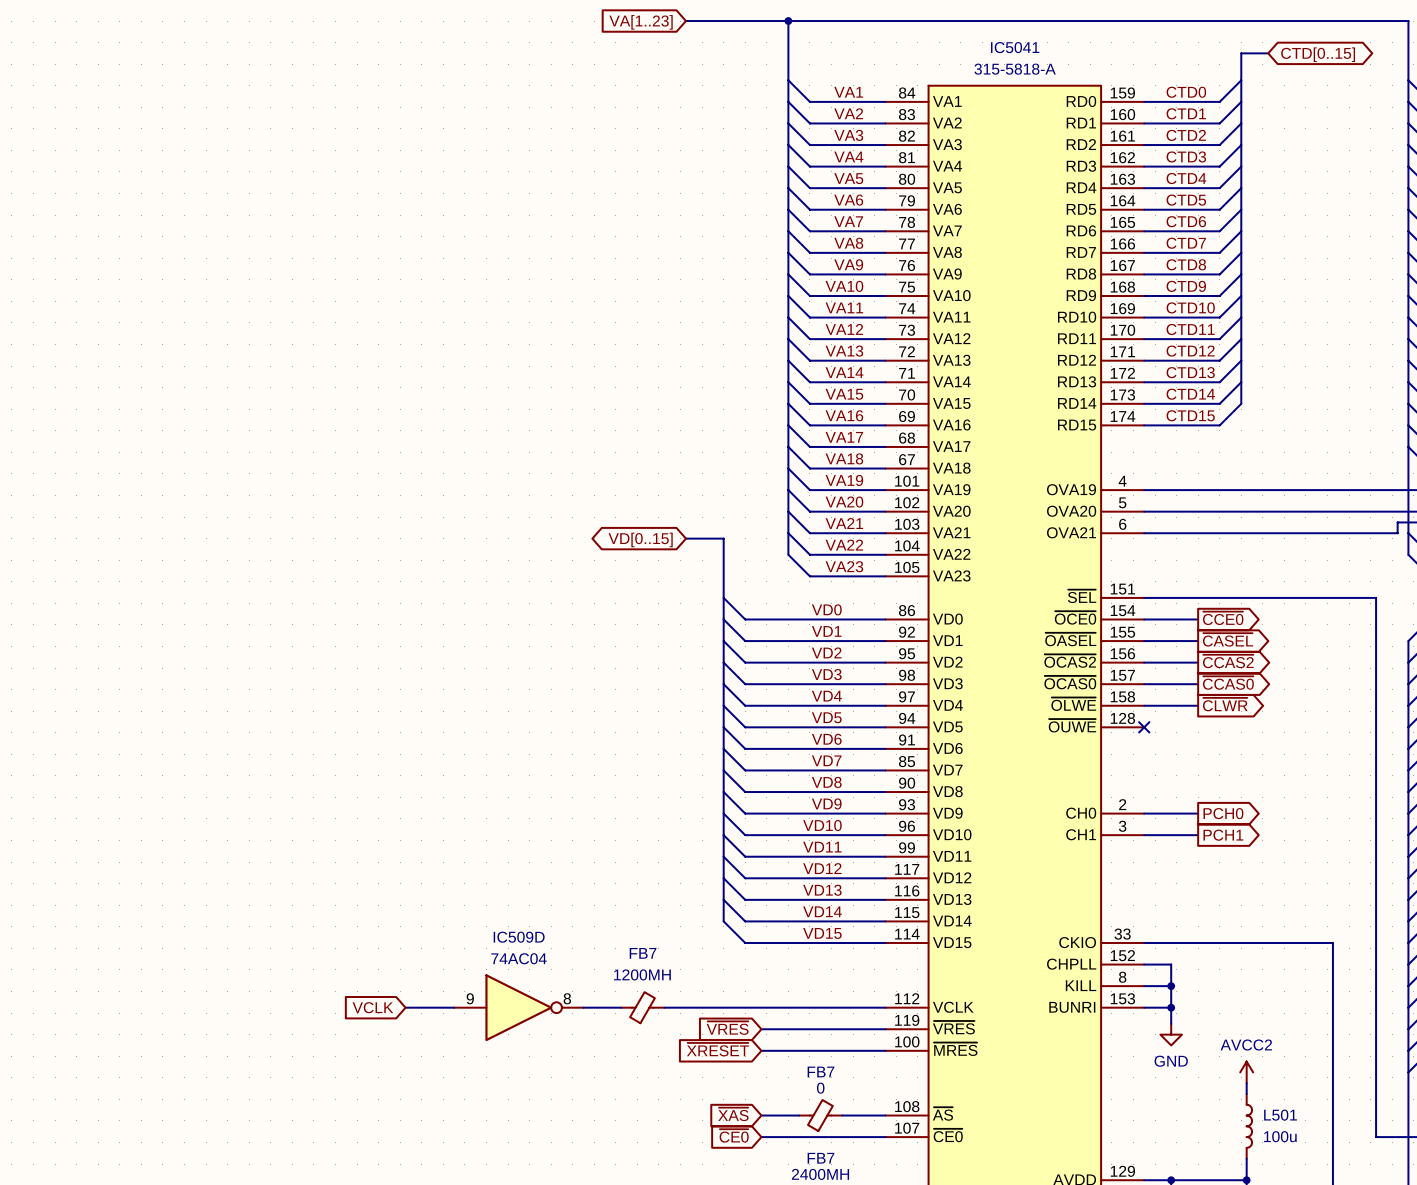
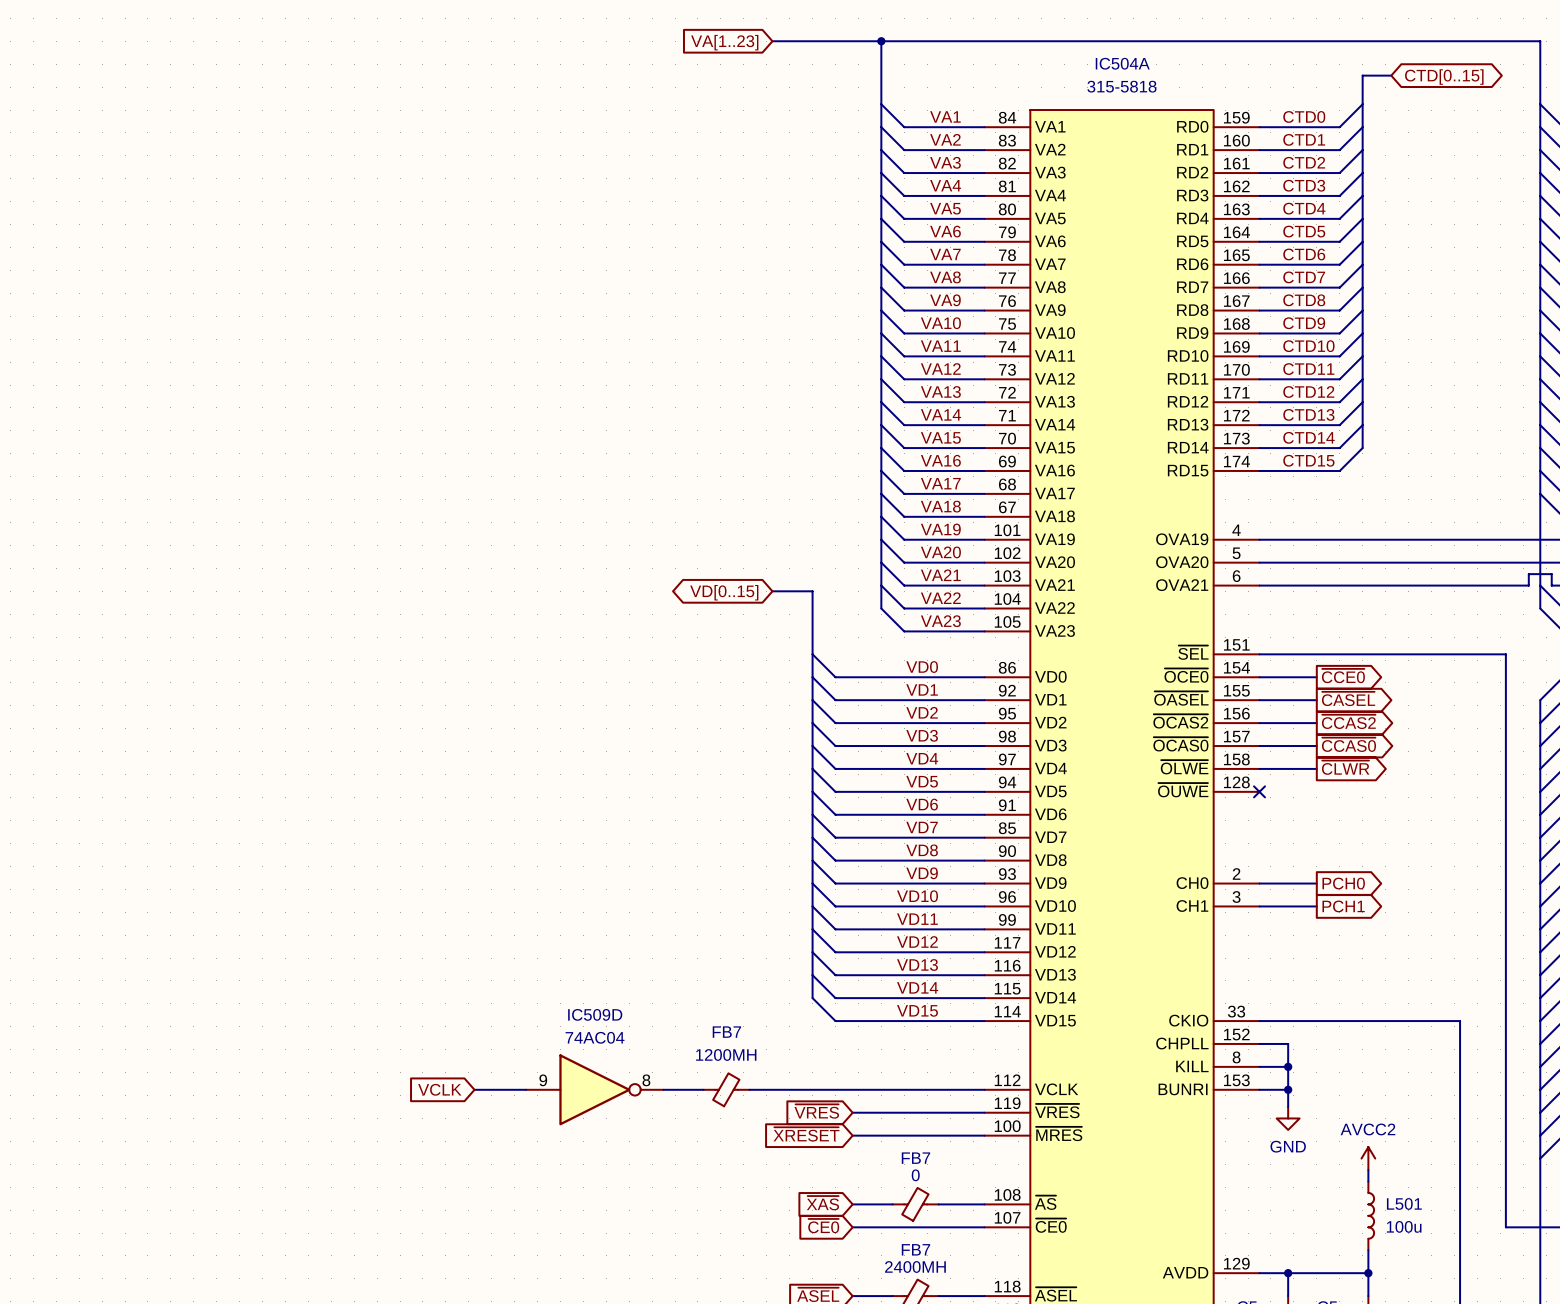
IC5041 name: IC5041 (1015, 47) -> IC504A (1122, 63)
IC5041 value: 315-5818-A (1015, 69) -> 315-5818 (1121, 86)

